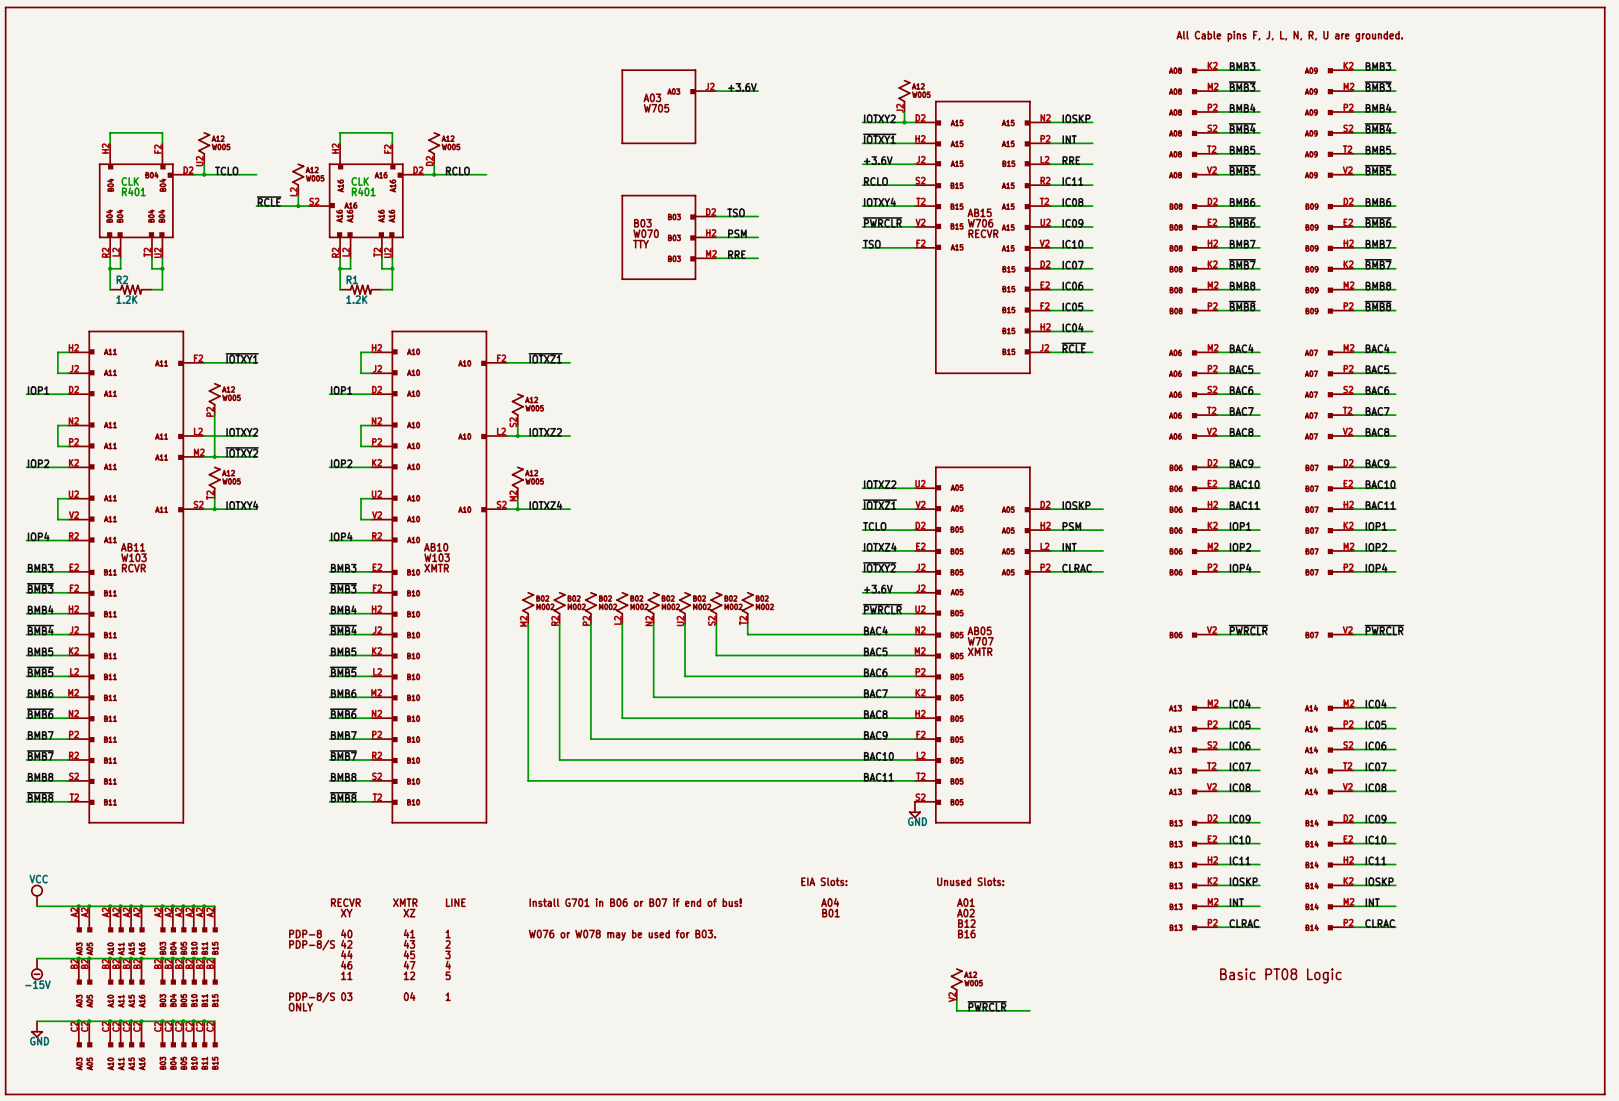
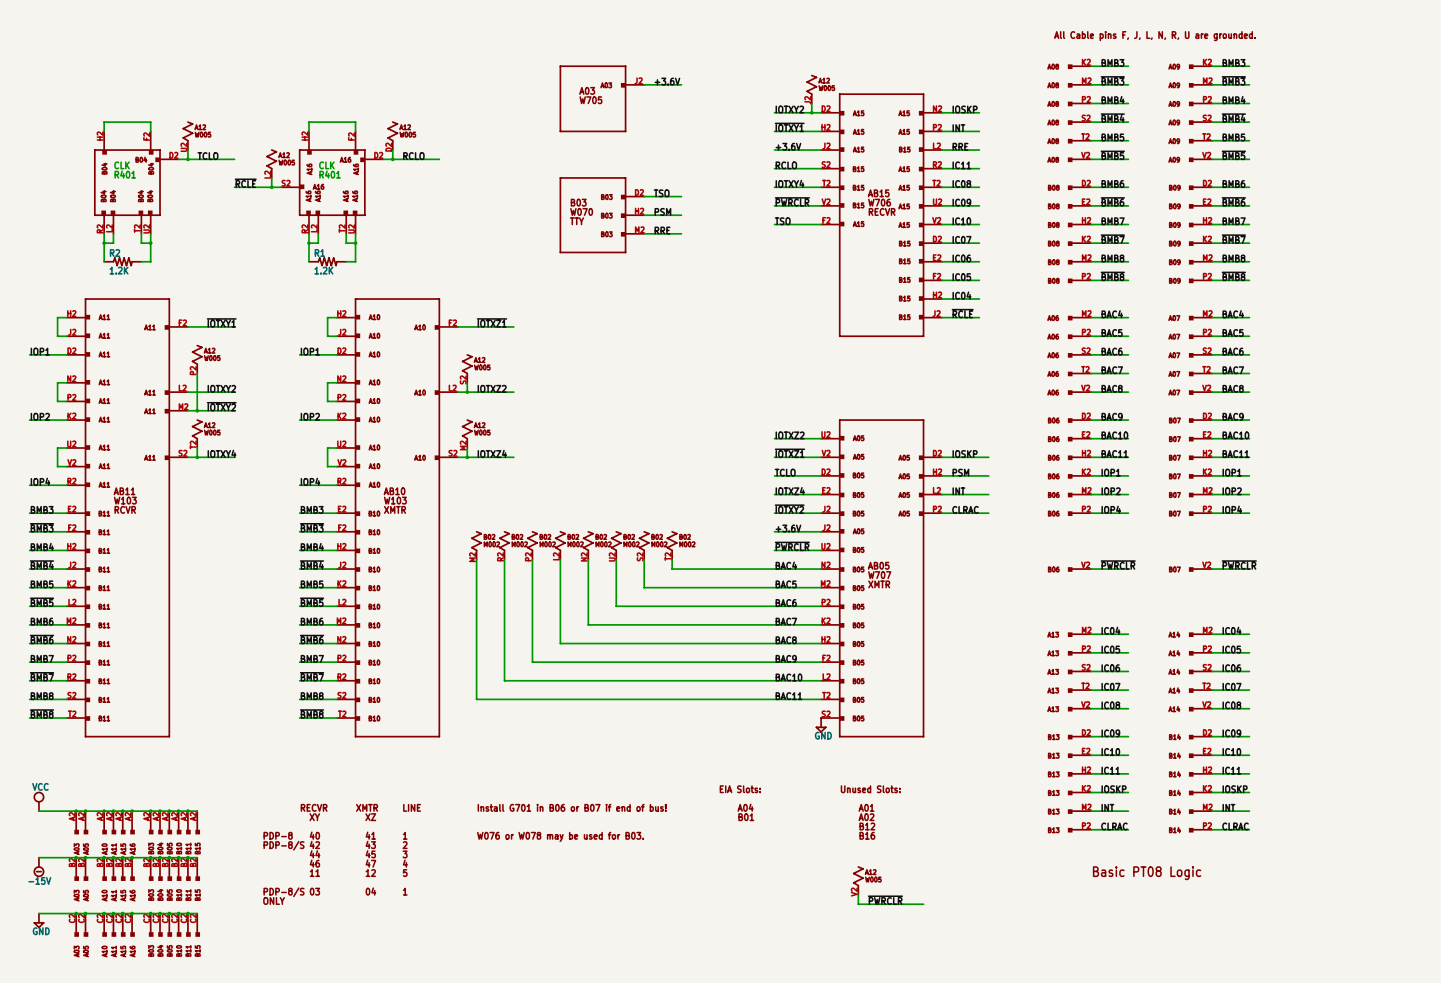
part: (805, 550) -> none

